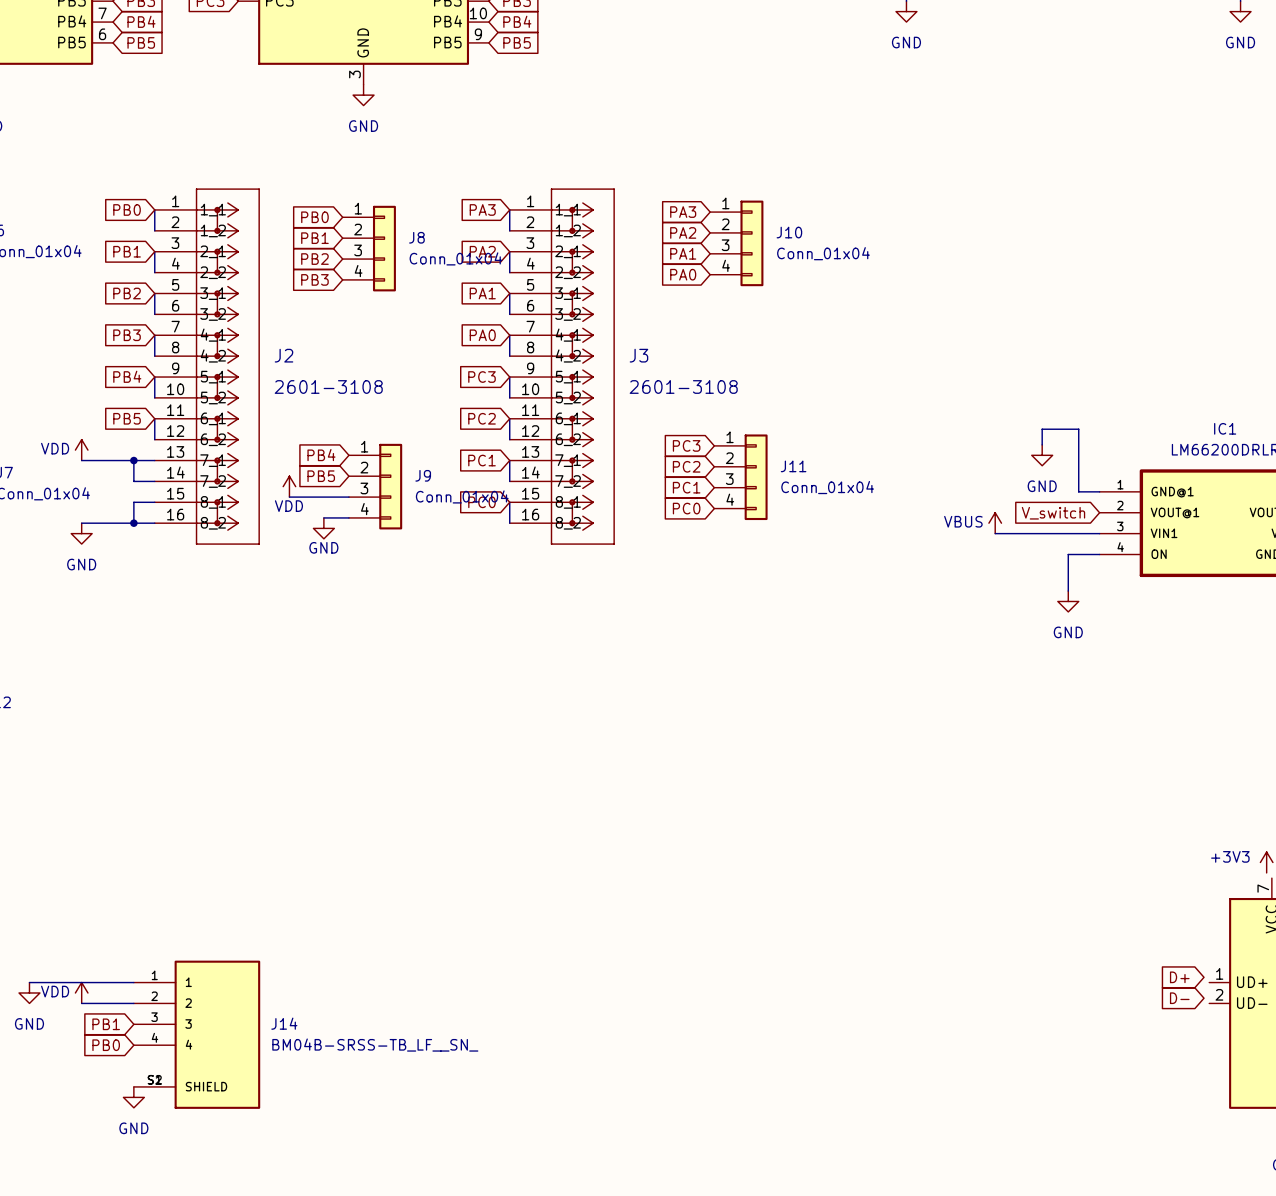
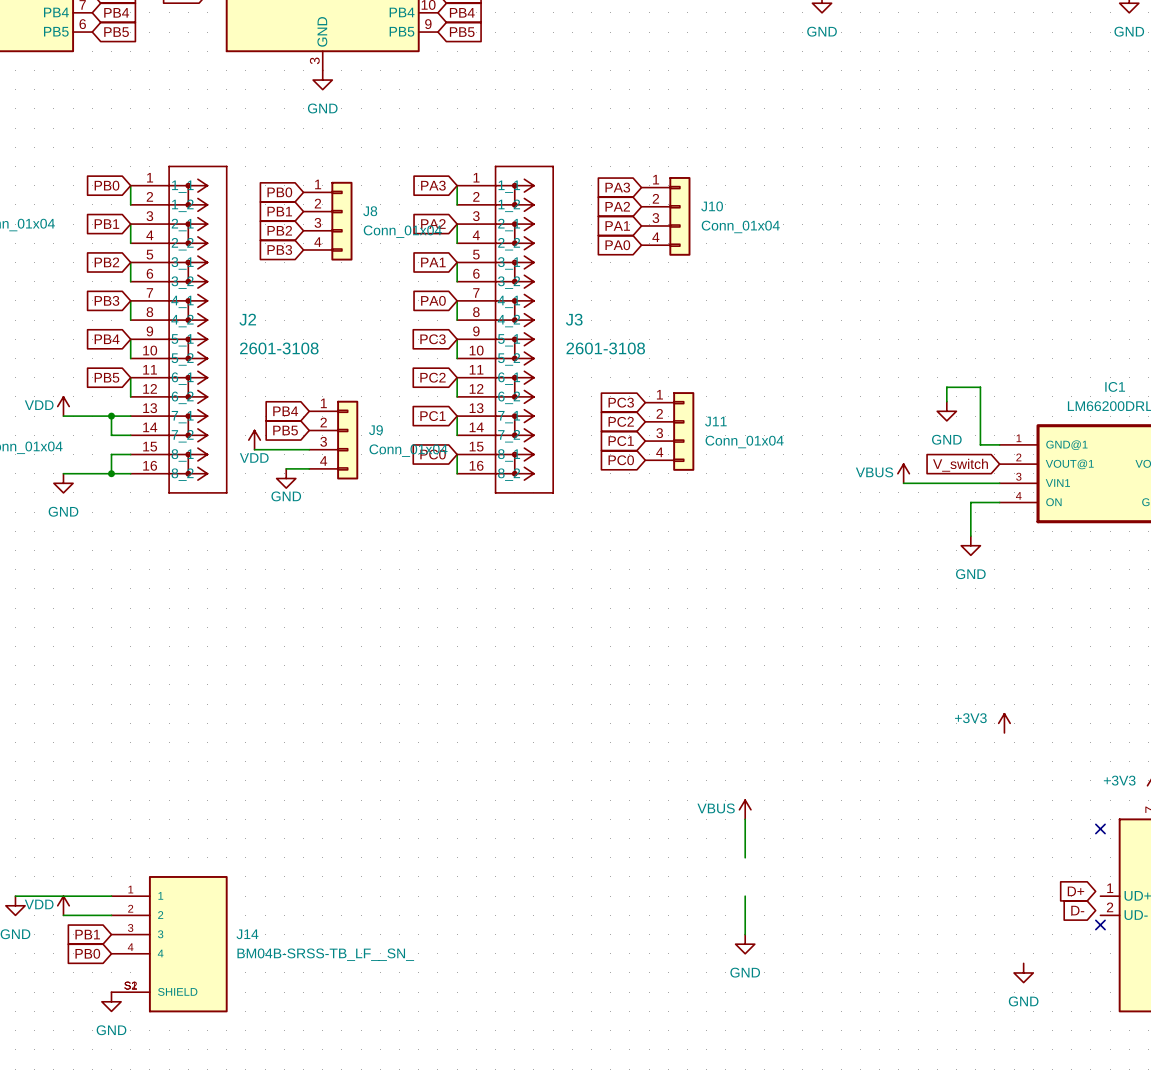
power symbol: none -> +3V3 (1004, 723)
power symbol: none -> VBUS (745, 809)
wire: none -> (745, 819) (745, 857)
no-connect mark: none -> (1100, 828)
wire: none -> (745, 896) (745, 934)
no-connect mark: none -> (1100, 924)
power symbol: none -> GND (745, 944)
power symbol: none -> GND (1023, 972)

